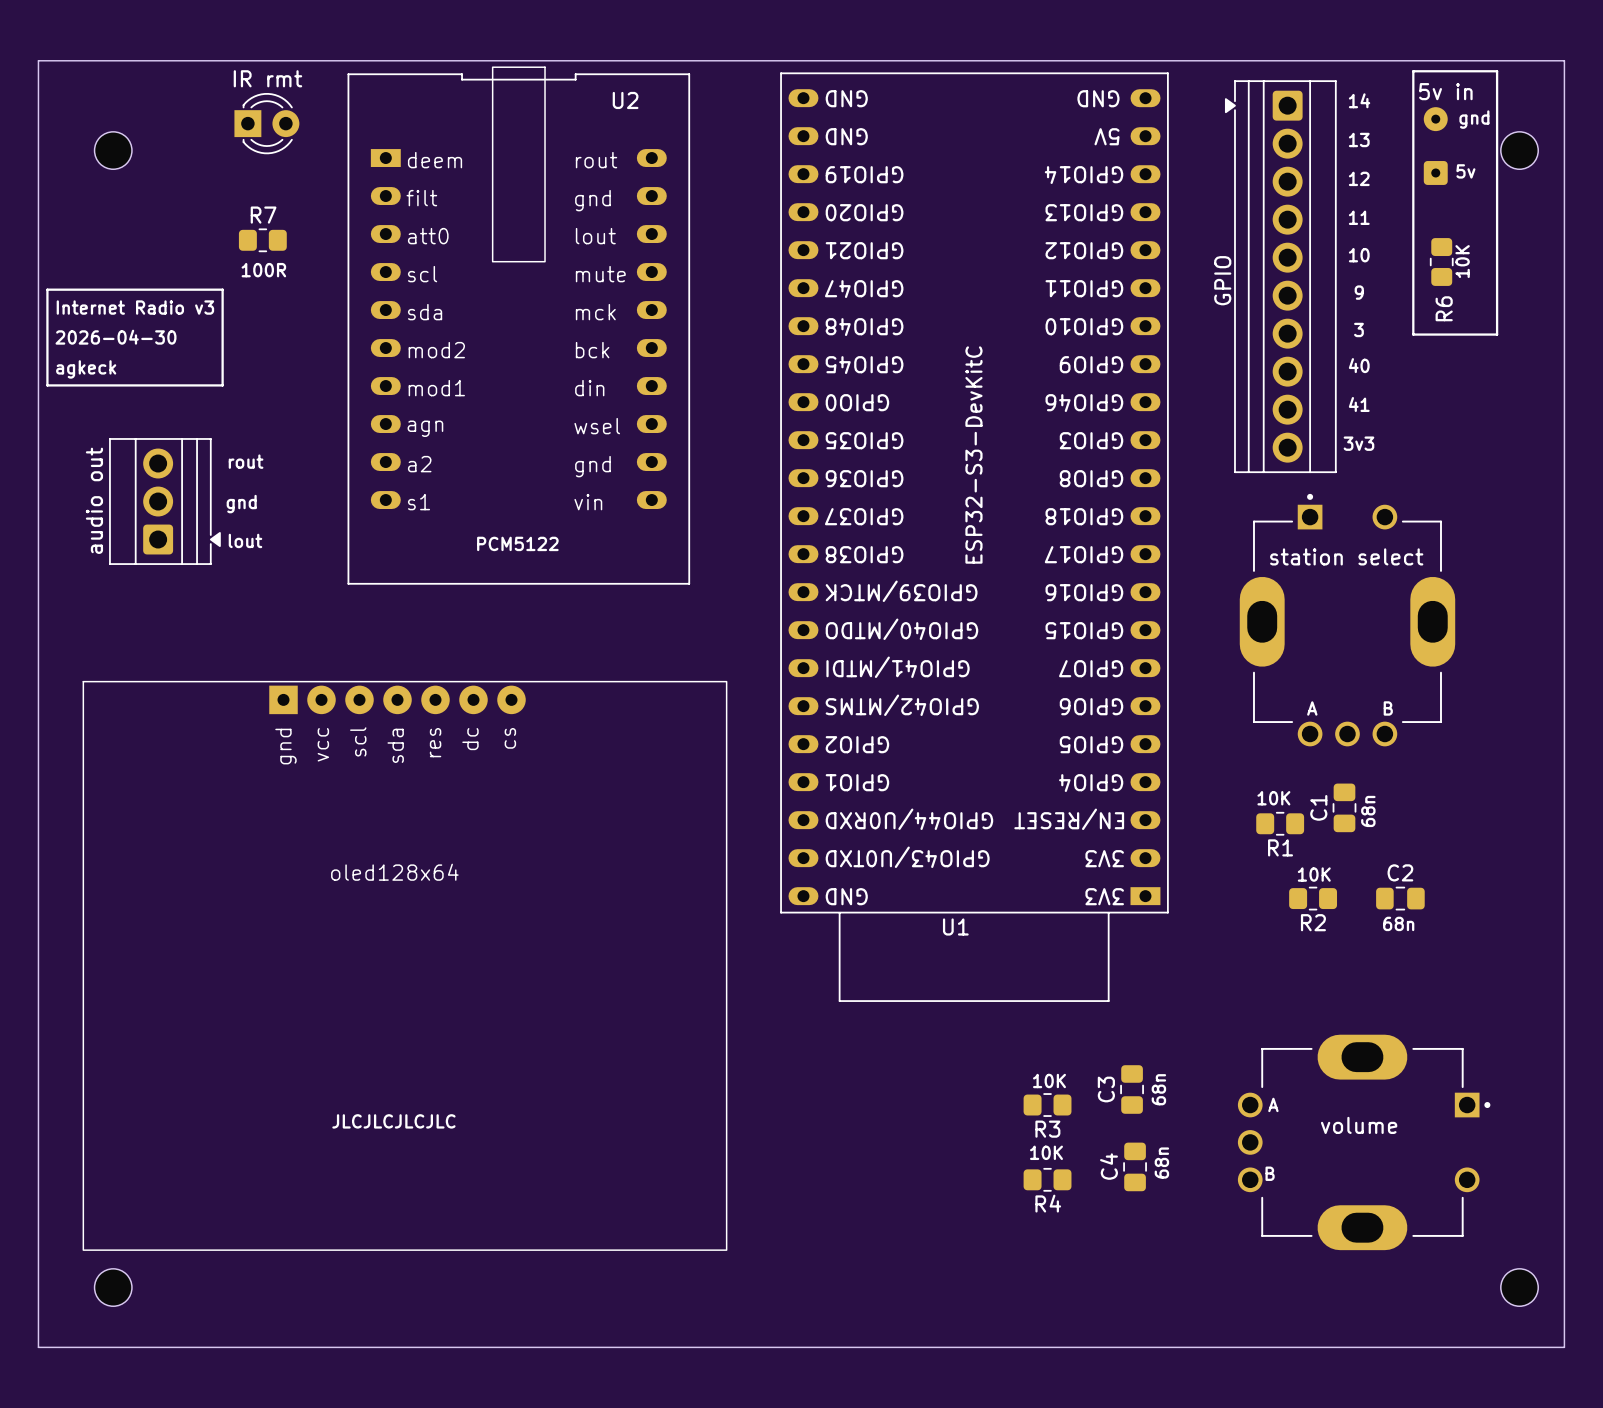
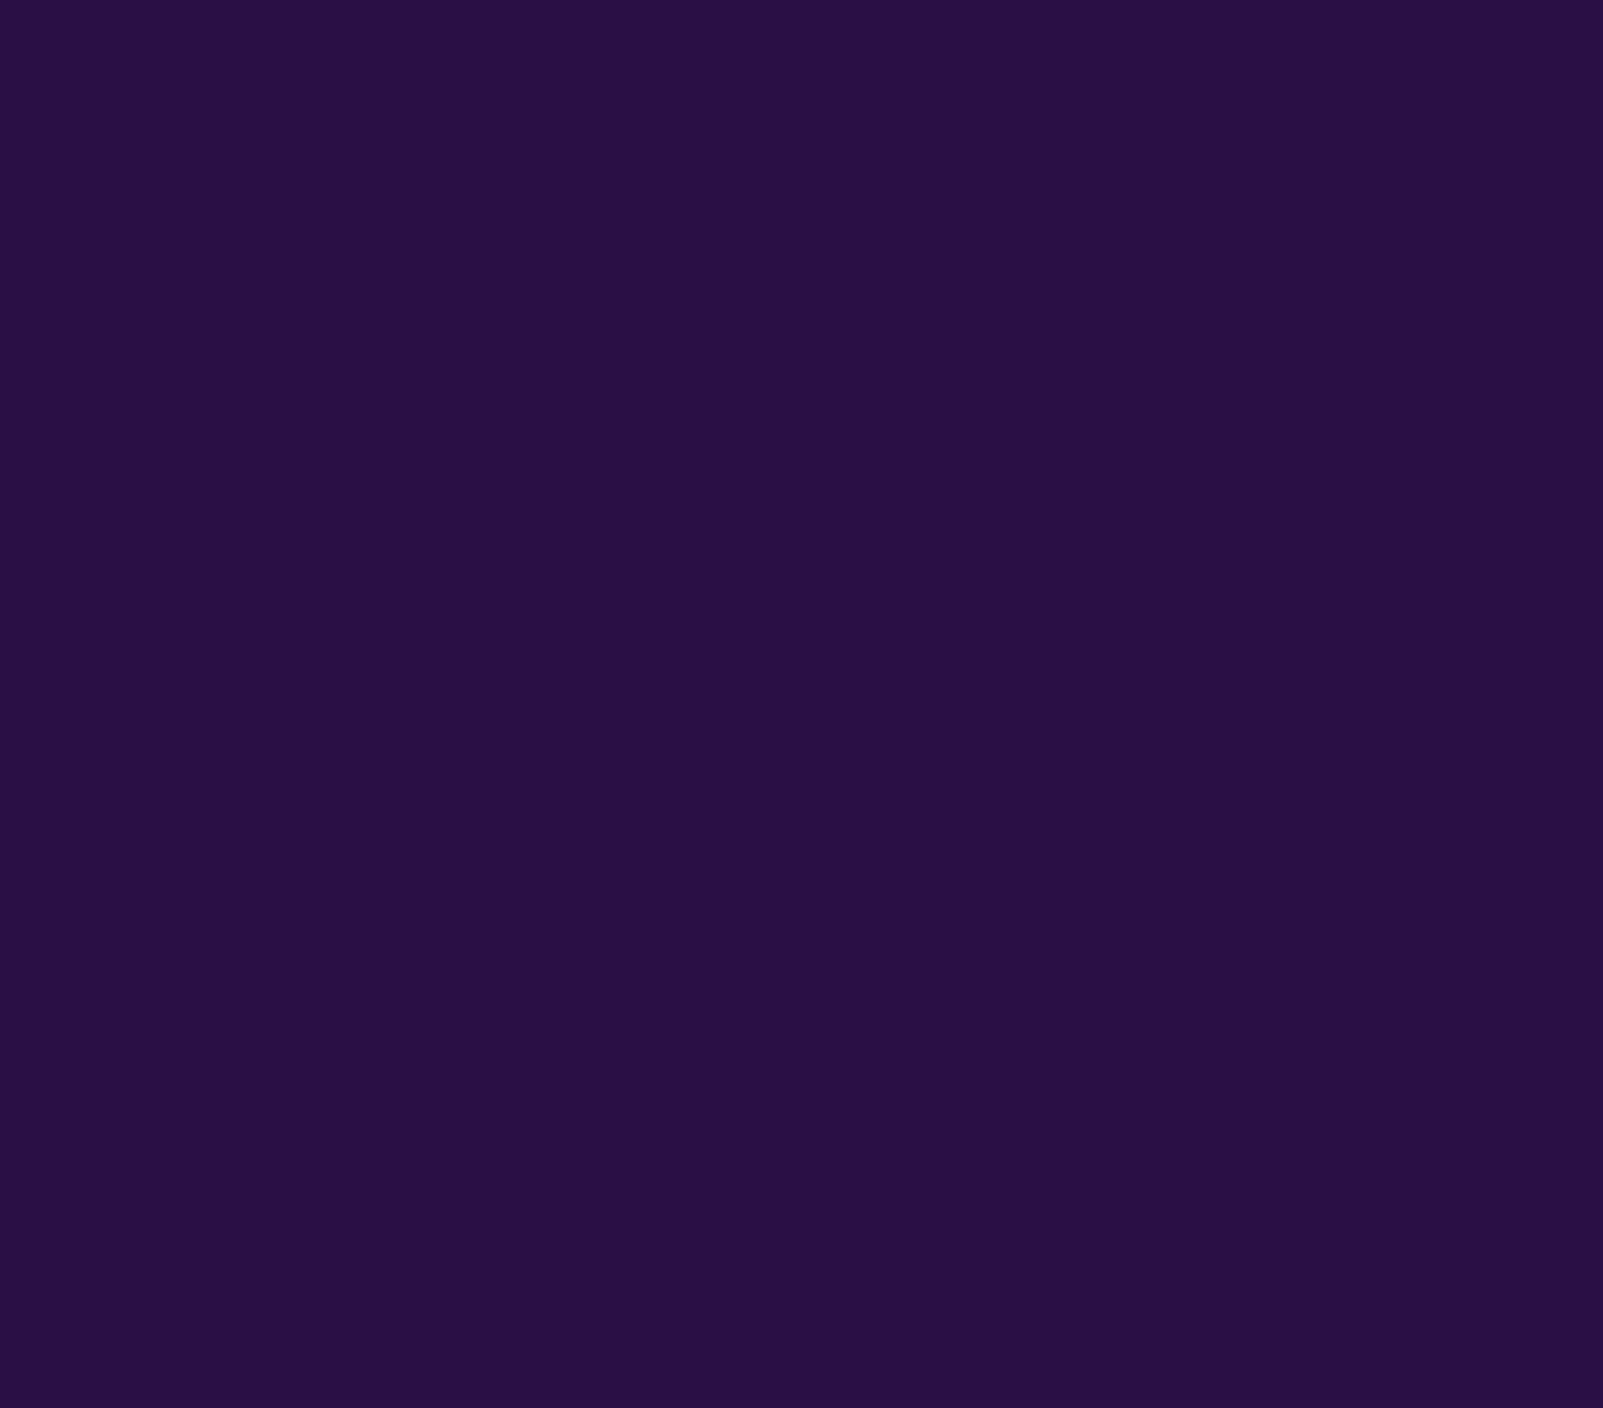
board edge: (38, 60) (1564, 60) (1564, 1347) (38, 1347) (38, 60) -> none
line: (1413, 71) (1497, 71) (1497, 334) (1413, 334) (1413, 71) -> none
text: 14 (1359, 100) -> none
text: gnd (1474, 119) -> none
IR rmt: (266, 123) -> none
text: 13 (1359, 139) -> none
5v in: (1435, 146) -> none
part: (113, 150) -> none
part: (1519, 150) -> none
text: 5v (1465, 171) -> none
text: 12 (1359, 178) -> none
text: 11 (1359, 217) -> none
R7: (262, 240) -> none
text: 10 (1359, 255) -> none
text: 10K (1462, 261) -> none
R6: (1441, 262) -> none
text: 100R (263, 270) -> none
GPIO: (1280, 276) -> none
line: (47, 289) (222, 289) (222, 385) (47, 385) (47, 289) -> none
text: 9 (1359, 292) -> none
text: Internet Radio v3 (135, 307) -> none
U2: (518, 325) -> none
text: 3 (1358, 329) -> none
text: 2026-04-30 (116, 337) -> none
text: 40 (1359, 365) -> none
text: agkeck (86, 369) -> none
text: 41 (1359, 404) -> none
text: 3v3 (1358, 443) -> none
text: rout (246, 461) -> none
audio out: (164, 501) -> none
text: gnd (241, 504) -> none
U1: ESP32-S3-DevKitC (974, 537) -> none
text: lout (245, 540) -> none
text: PCM5122 (517, 543) -> none
station select: (1347, 620) -> none
text: A (1312, 708) -> none
text: B (1388, 708) -> none
text: 10K (1273, 798) -> none
C1: (1344, 807) -> none
text: 68n (1368, 811) -> none
R1: (1280, 823) -> none
text: 10K (1314, 874) -> none
R2: (1313, 898) -> none
C2: (1400, 898) -> none
text: 68n (1398, 923) -> none
oled128x64: (404, 965) -> none
text: 10K (1049, 1080) -> none
C3: (1132, 1089) -> none
text: 68n (1158, 1089) -> none
text: A (1273, 1104) -> none
R3: (1047, 1105) -> none
text: JLCJLCJLCJLC (393, 1121) -> none
volume: (1364, 1142) -> none
text: 10K (1046, 1152) -> none
text: 68n (1161, 1163) -> none
C4: (1135, 1166) -> none
text: B (1270, 1173) -> none
R4: (1047, 1179) -> none
part: (113, 1287) -> none
part: (1519, 1287) -> none

